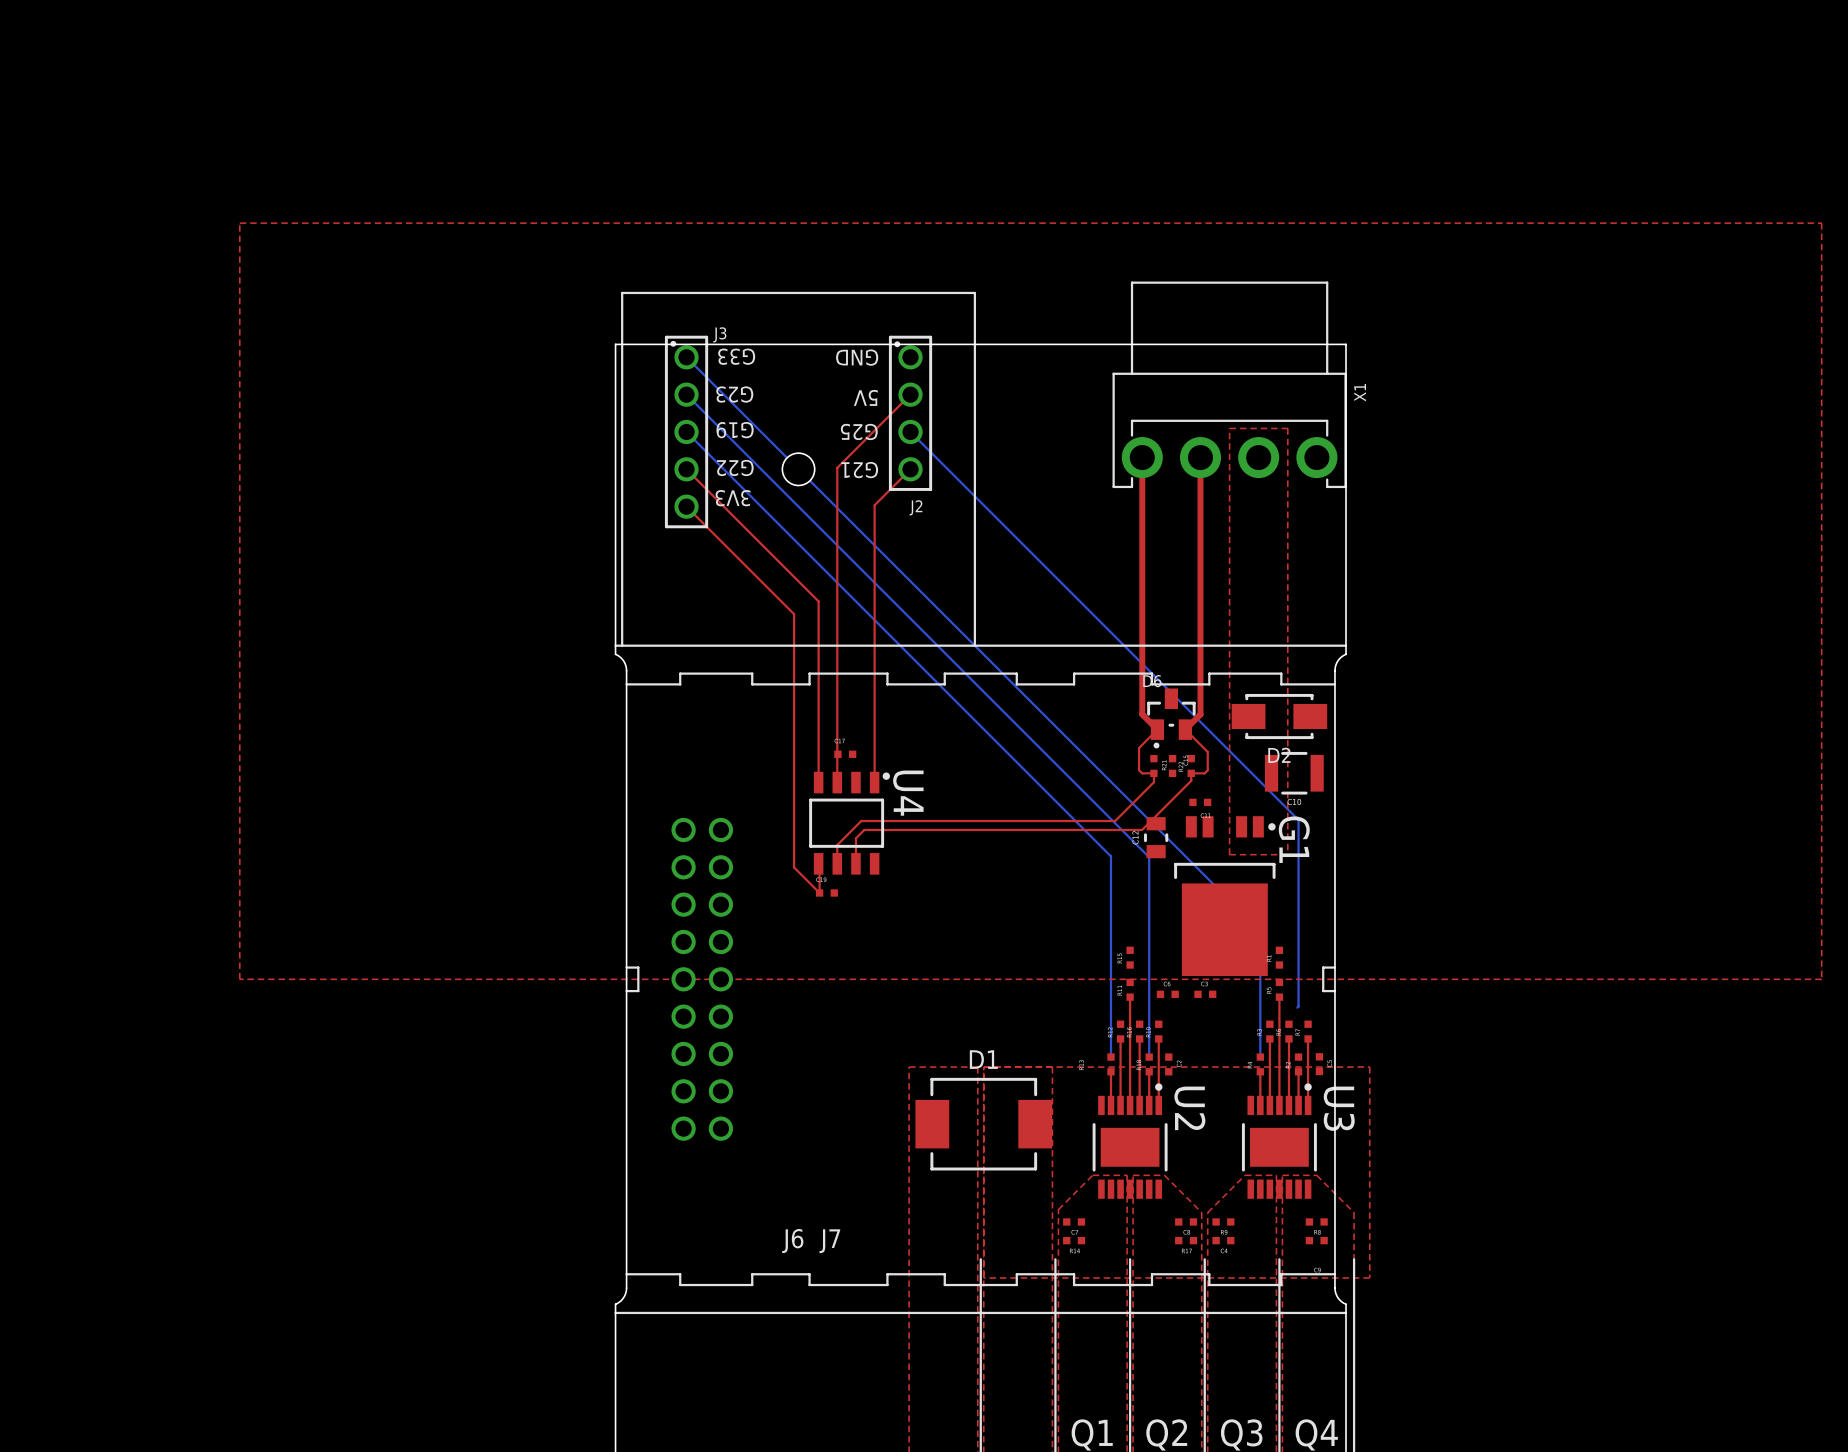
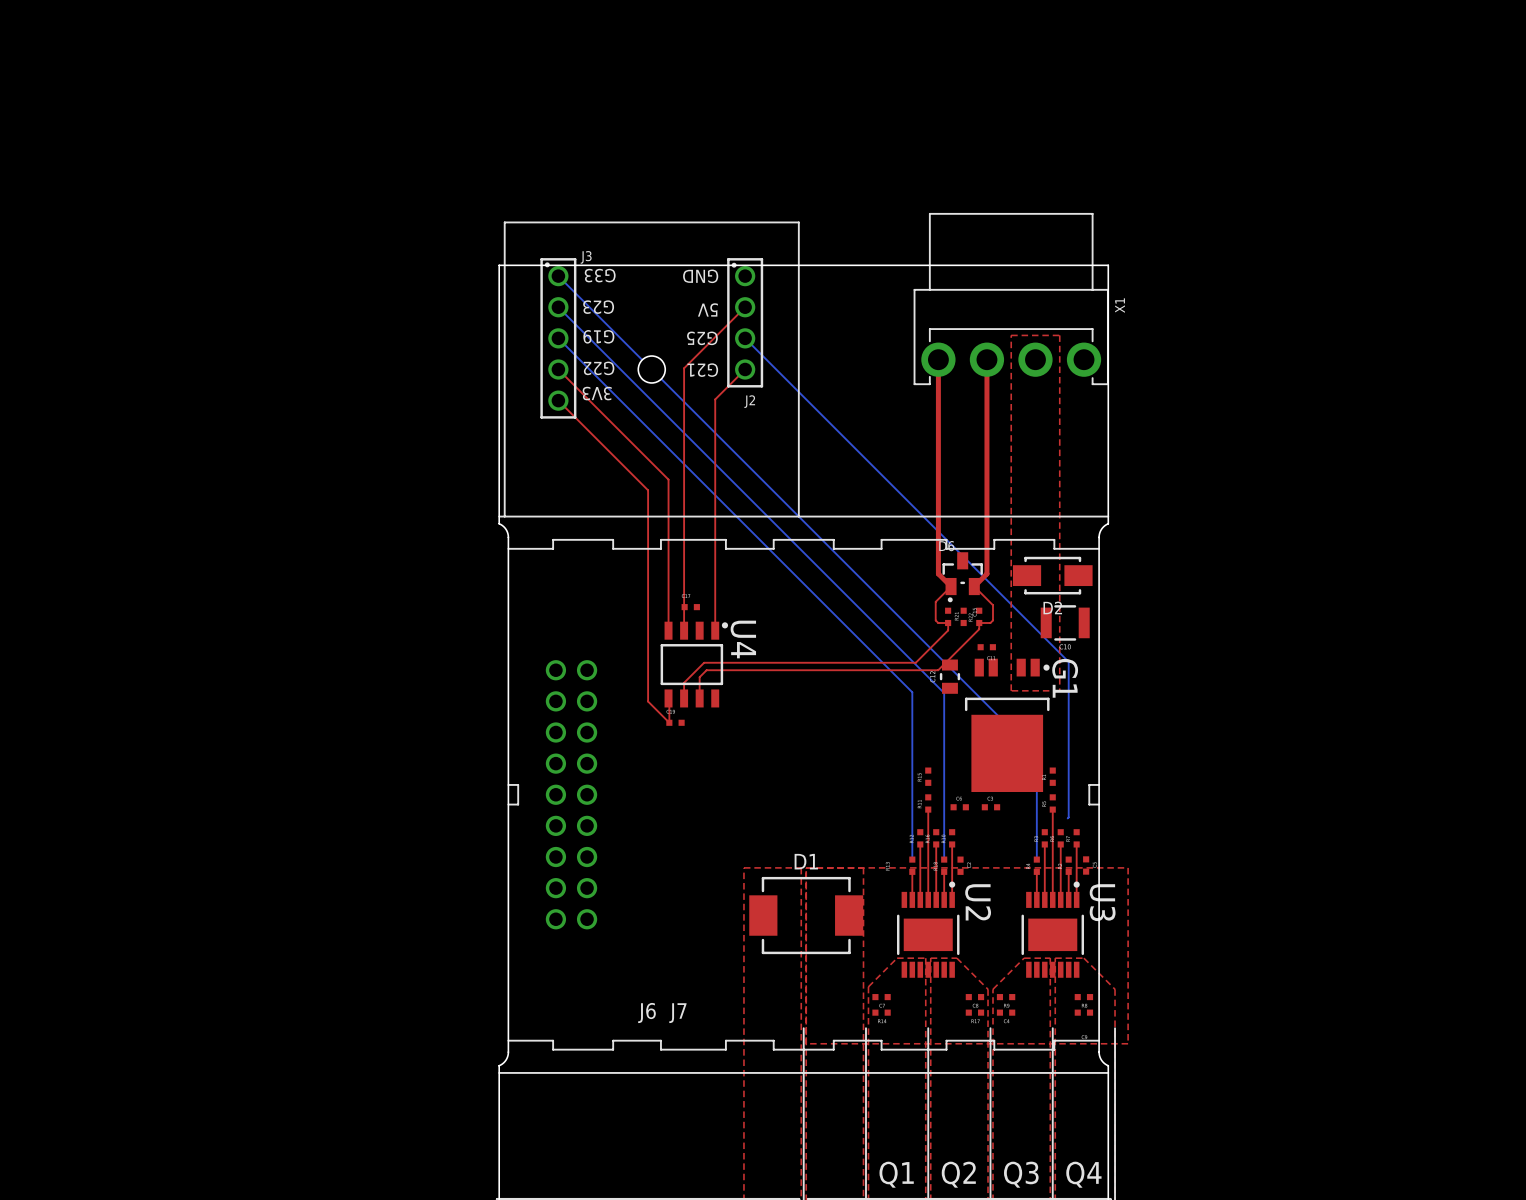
top zone outline: (239, 223) (239, 979) (1821, 979) (1821, 223) (239, 223) -> none

